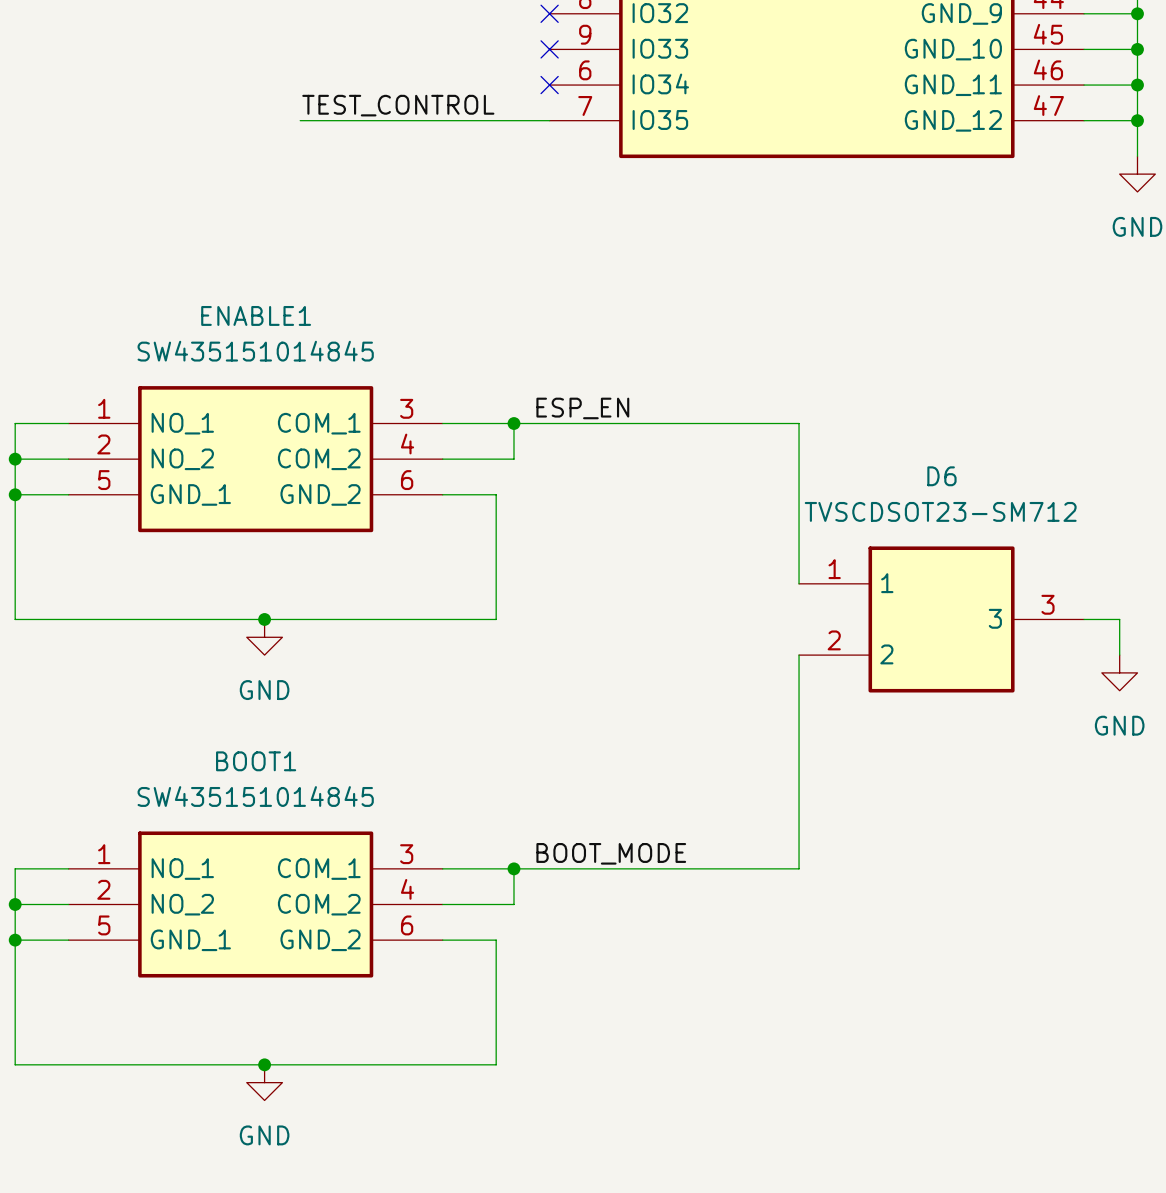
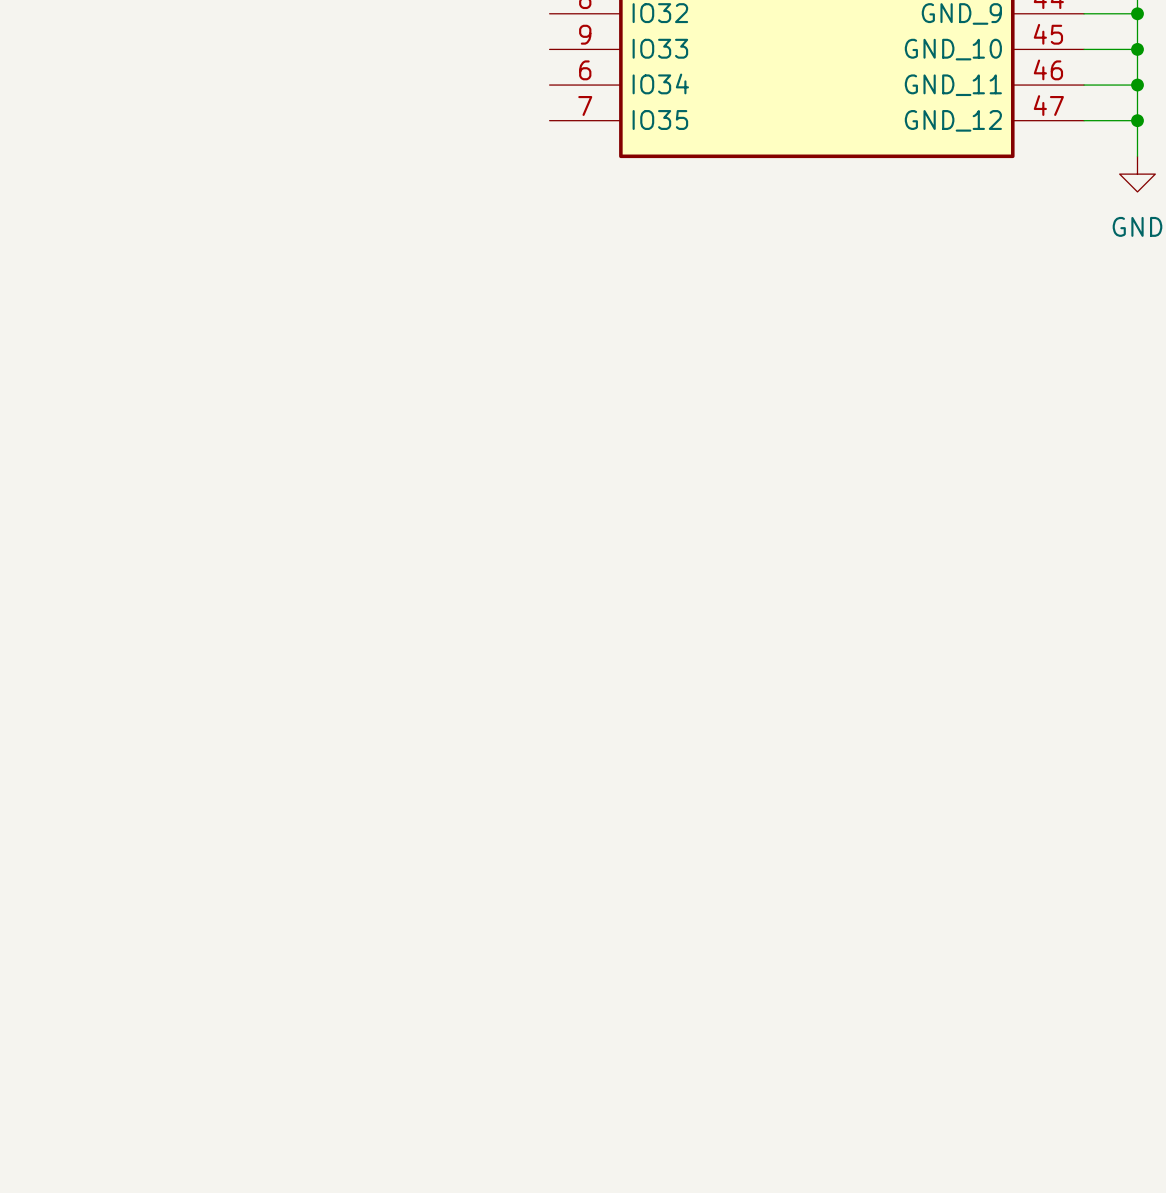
no-connect mark: (549, 13) -> none
no-connect mark: (549, 49) -> none
no-connect mark: (549, 85) -> none
label: TEST_CONTROL (398, 105) -> none
wire: (300, 120) (549, 120) -> none
label: ESP_EN (582, 408) -> none
wire: (68, 423) (15, 423) (15, 619) (496, 619) (496, 494) (442, 494) -> none
wire: (442, 423) (799, 423) (799, 583) -> none
wire: (513, 423) (513, 459) (442, 459) -> none
junction: (513, 423) -> none
wire: (15, 459) (68, 459) -> none
junction: (15, 459) -> none
ENABLE1: SW435151014845 (255, 459) -> none
wire: (15, 494) (68, 494) -> none
junction: (15, 494) -> none
junction: (264, 619) -> none
D6: TVSCDSOT23-SM712 (941, 619) -> none
wire: (1084, 619) (1119, 619) (1119, 655) -> none
power symbol: GND (264, 637) -> none
wire: (799, 655) (799, 868) (442, 868) -> none
power symbol: GND (1119, 672) -> none
label: BOOT_MODE (611, 853) -> none
wire: (68, 868) (15, 868) (15, 1064) (496, 1064) (496, 940) (442, 940) -> none
wire: (513, 868) (513, 904) (442, 904) -> none
junction: (513, 868) -> none
wire: (15, 904) (68, 904) -> none
junction: (15, 904) -> none
BOOT1: SW435151014845 (255, 904) -> none
wire: (15, 940) (68, 940) -> none
junction: (15, 940) -> none
junction: (264, 1064) -> none
power symbol: GND (264, 1082) -> none

